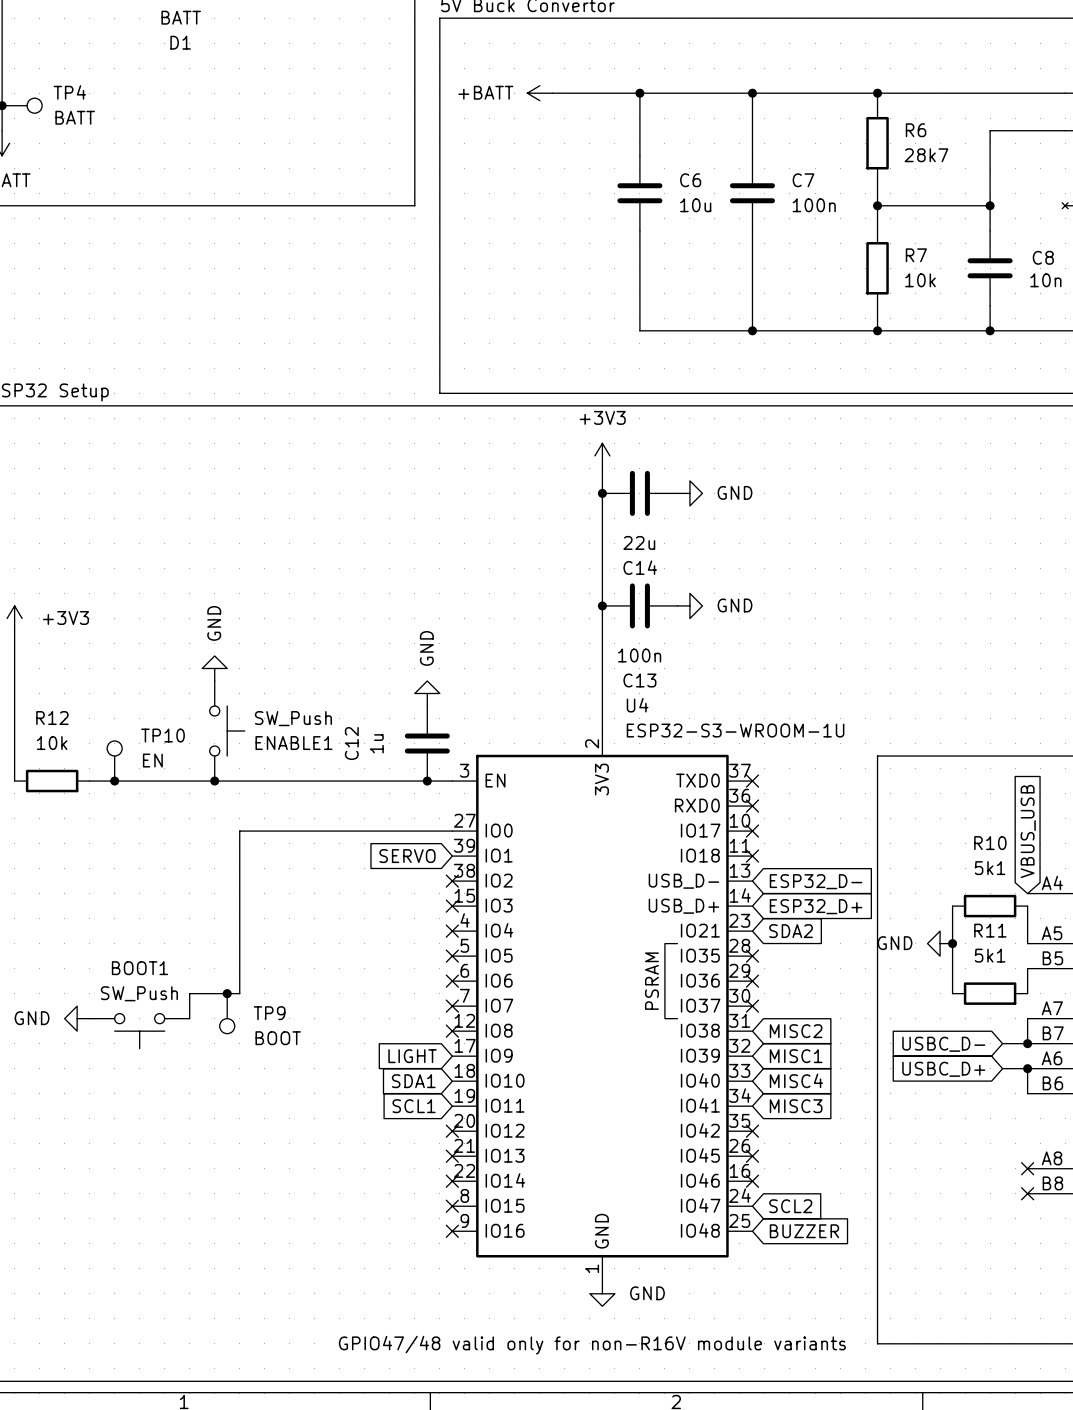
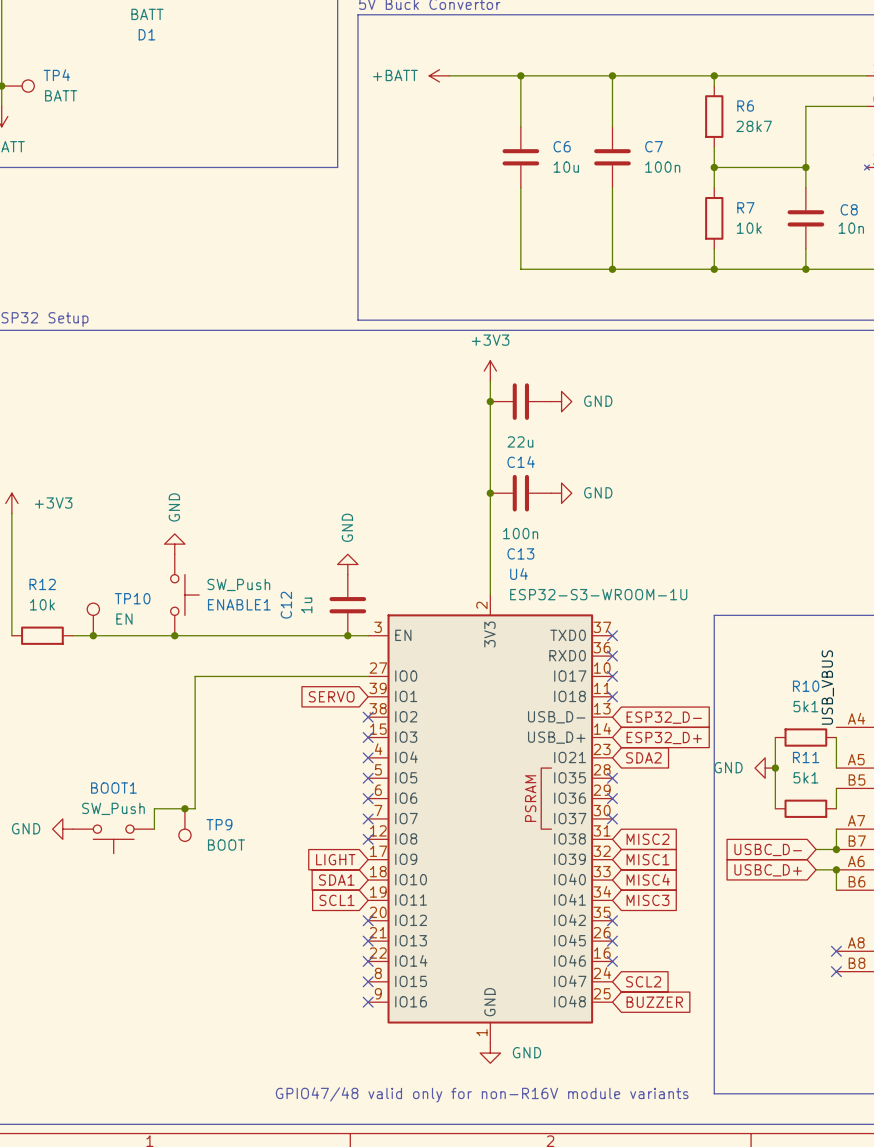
global label: VBUS_USB (1028, 831) -> none
label: none -> USB_VBUS (827, 687)

